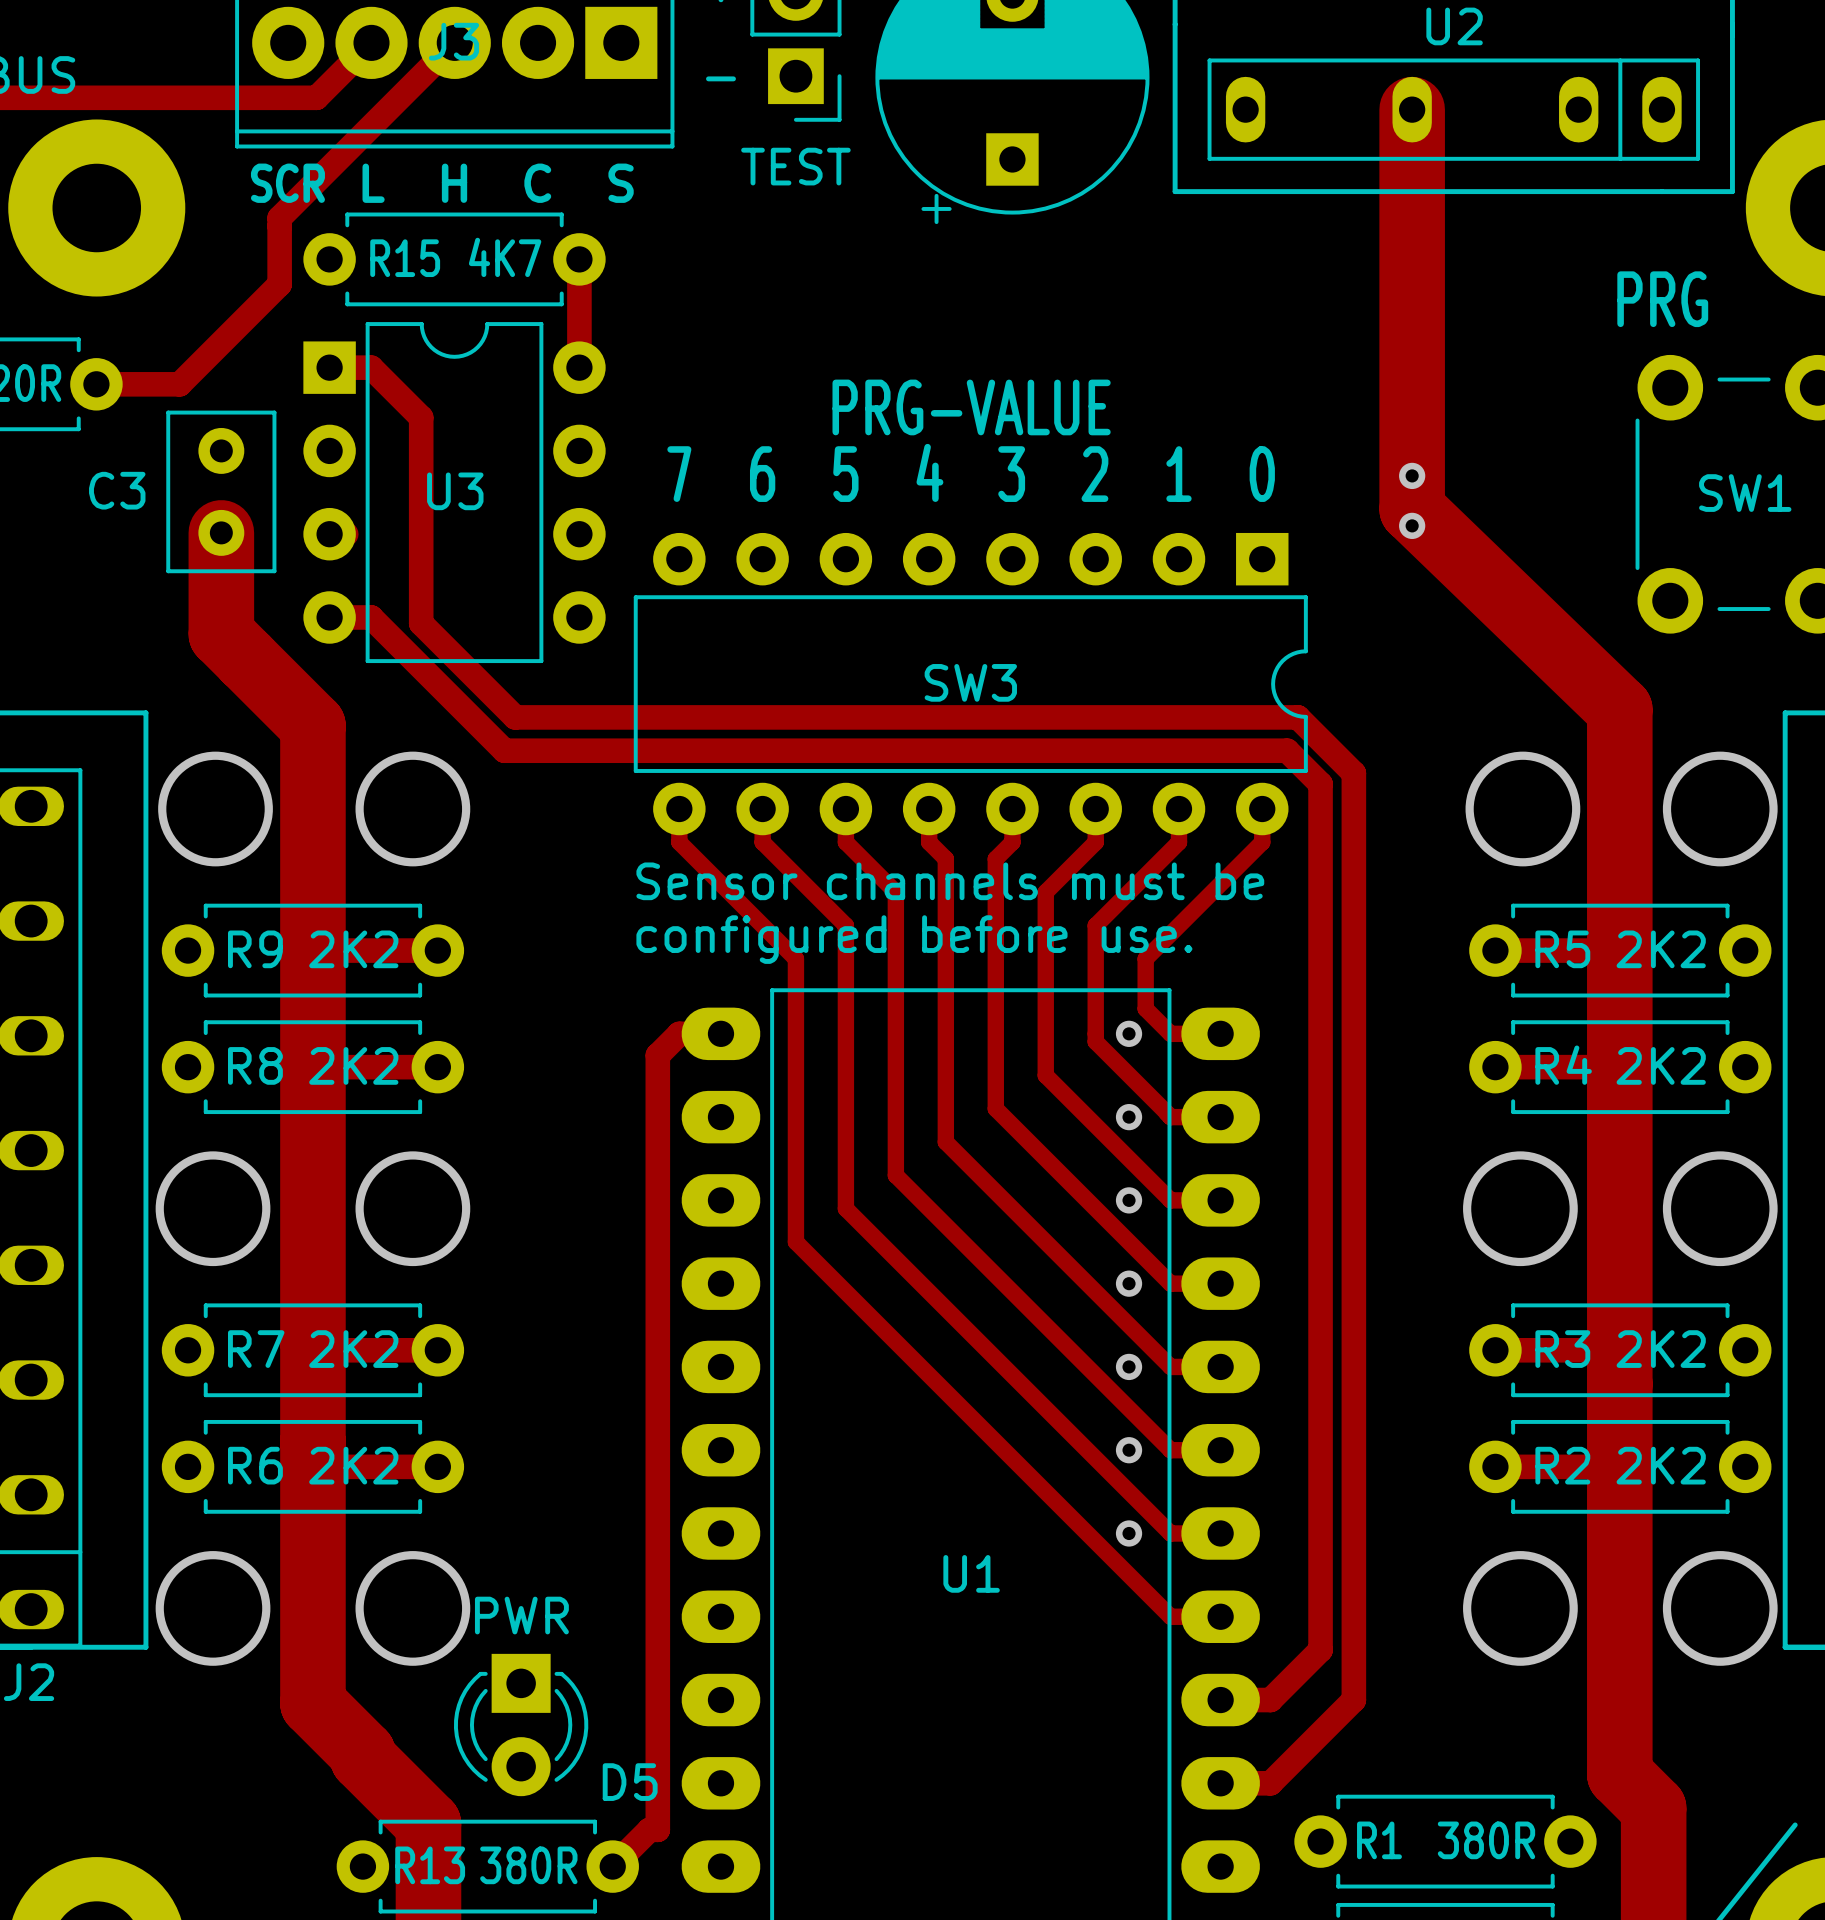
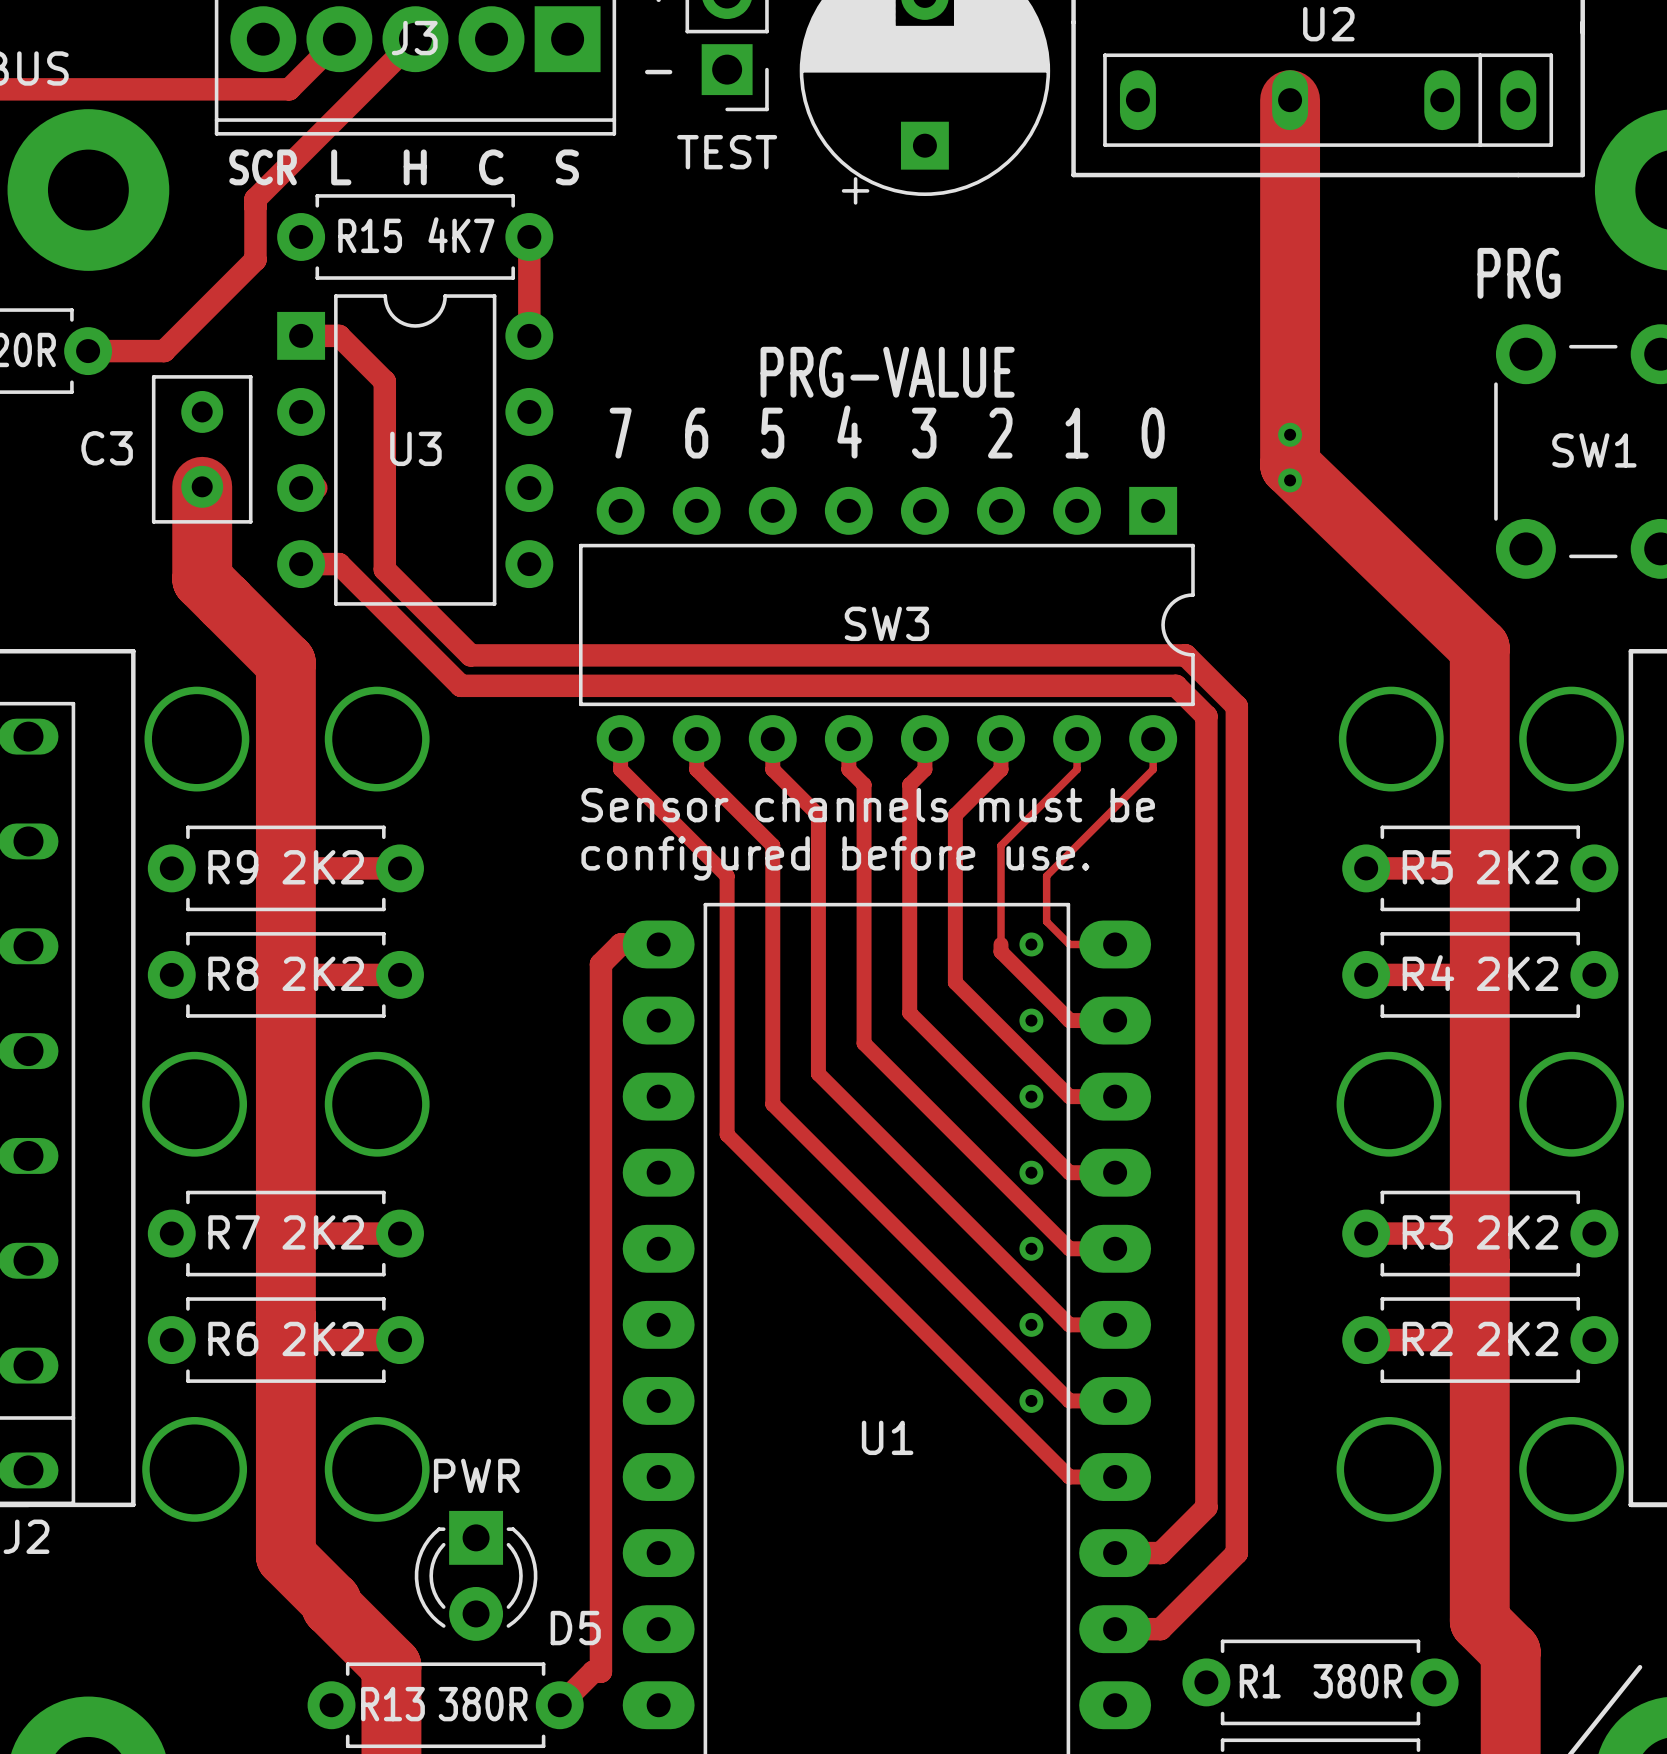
track width: thick (1178, 809) (1178, 842) (1095, 925) (1095, 1033) -> thin (1077, 739) (1077, 769) (1001, 845) (1001, 944)
track width: thick (1262, 809) (1262, 842) (1145, 958) (1145, 1008) (1170, 1033) (1220, 1033) -> thin (1153, 739) (1153, 769) (1046, 876) (1046, 921) (1069, 944) (1115, 944)

